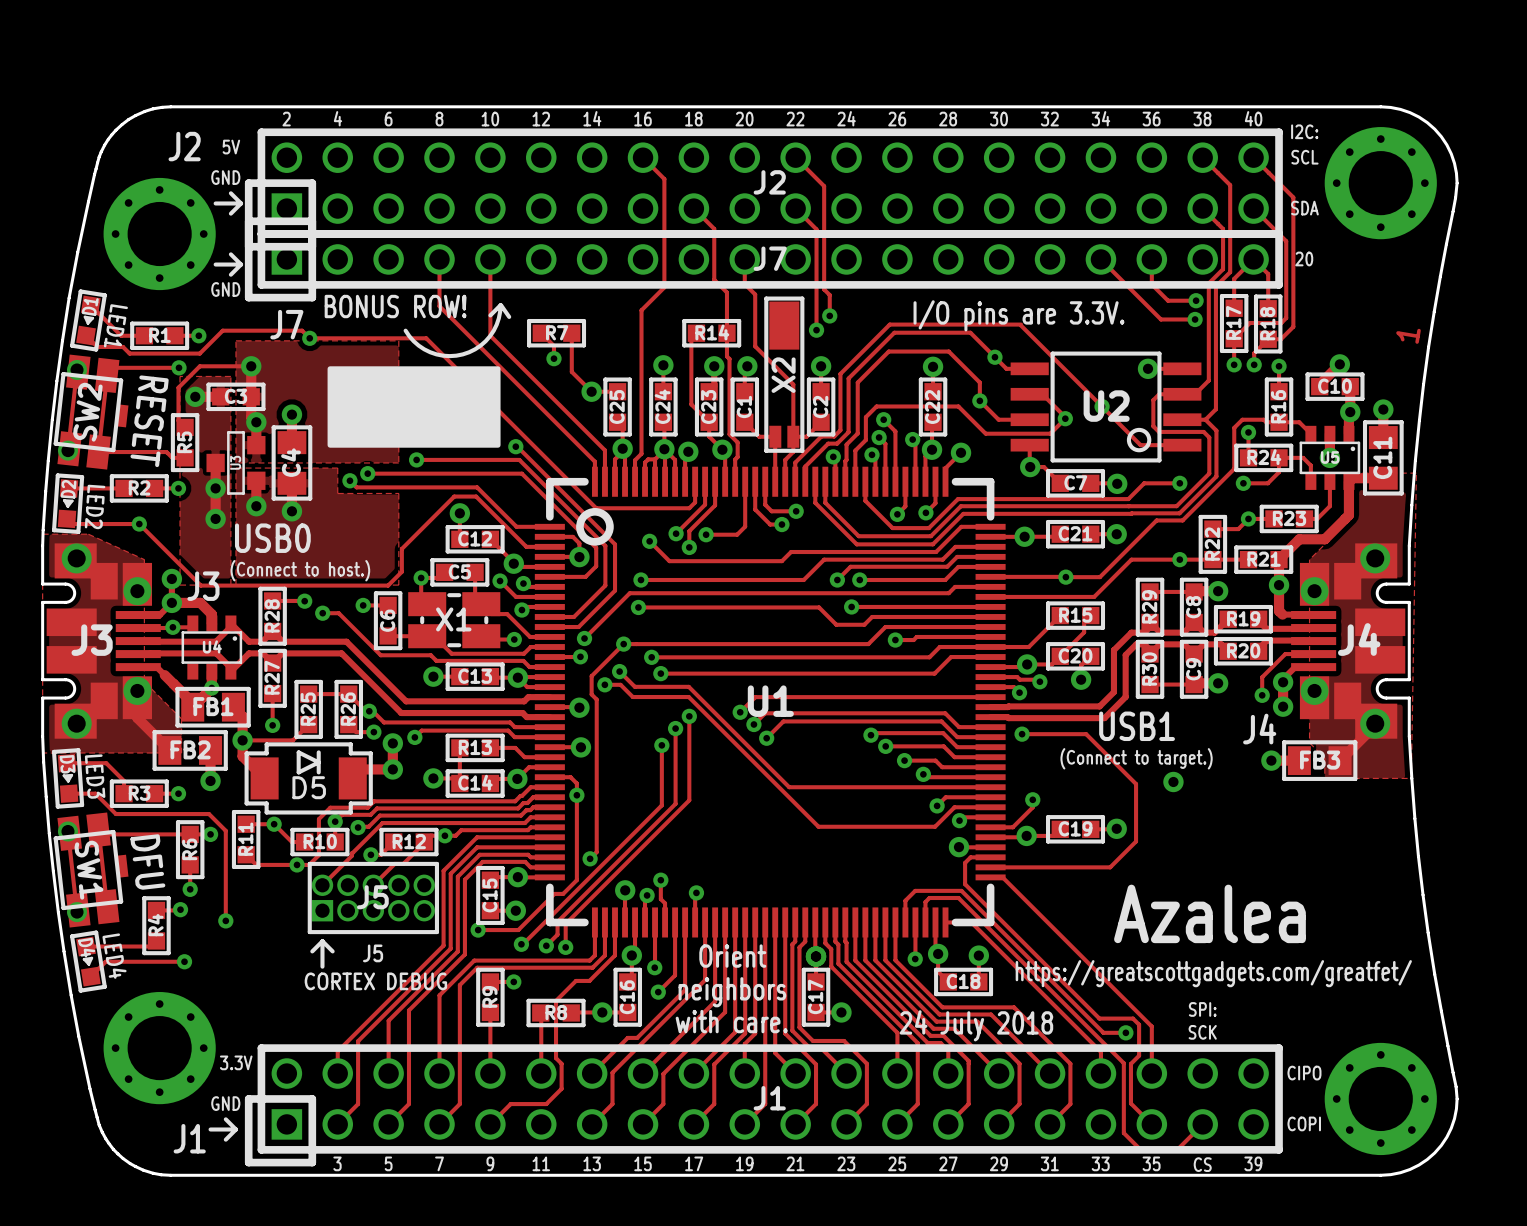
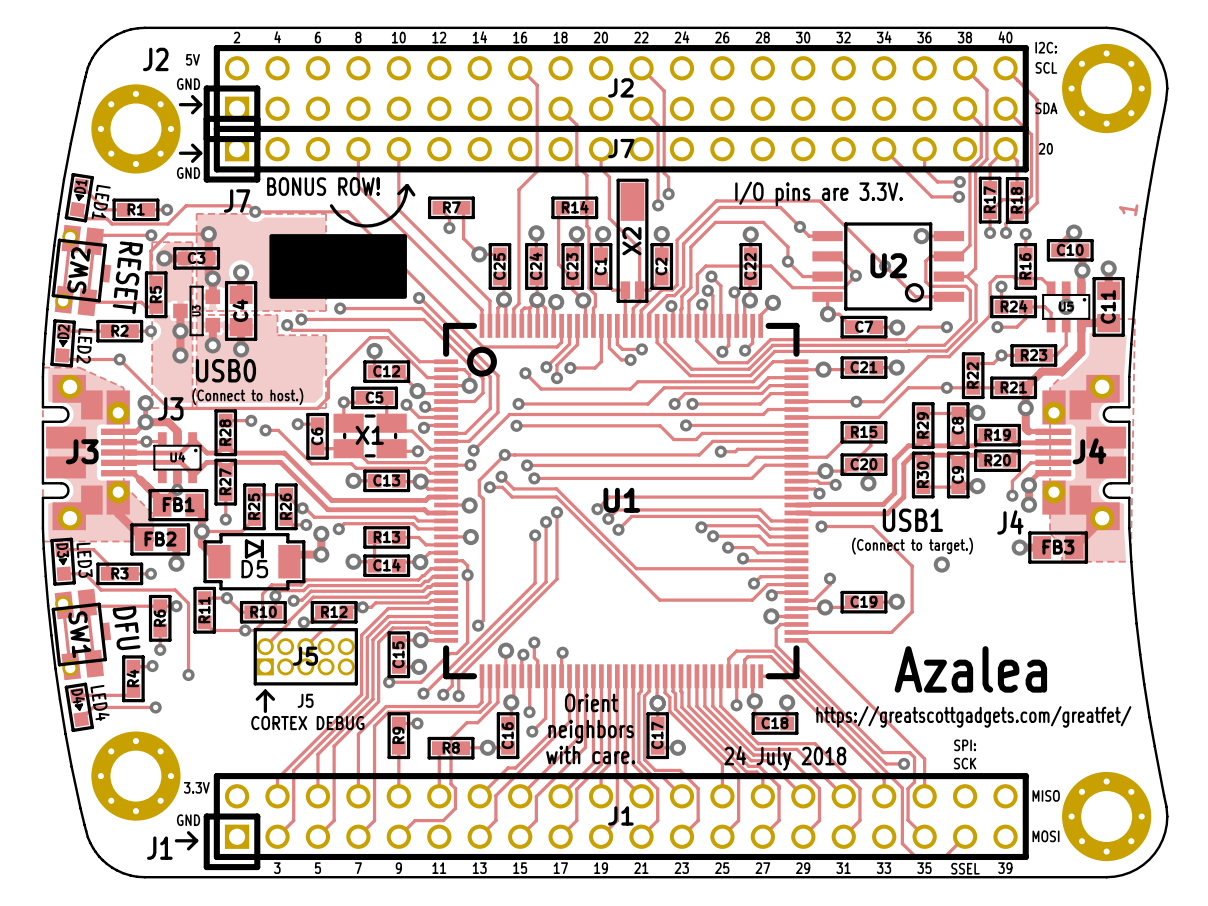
text: CIPO (1304, 1073) -> MISO (1046, 795)
text: COPI (1304, 1123) -> MOSI (1045, 836)
text: CS (1202, 1164) -> SSEL (965, 868)

